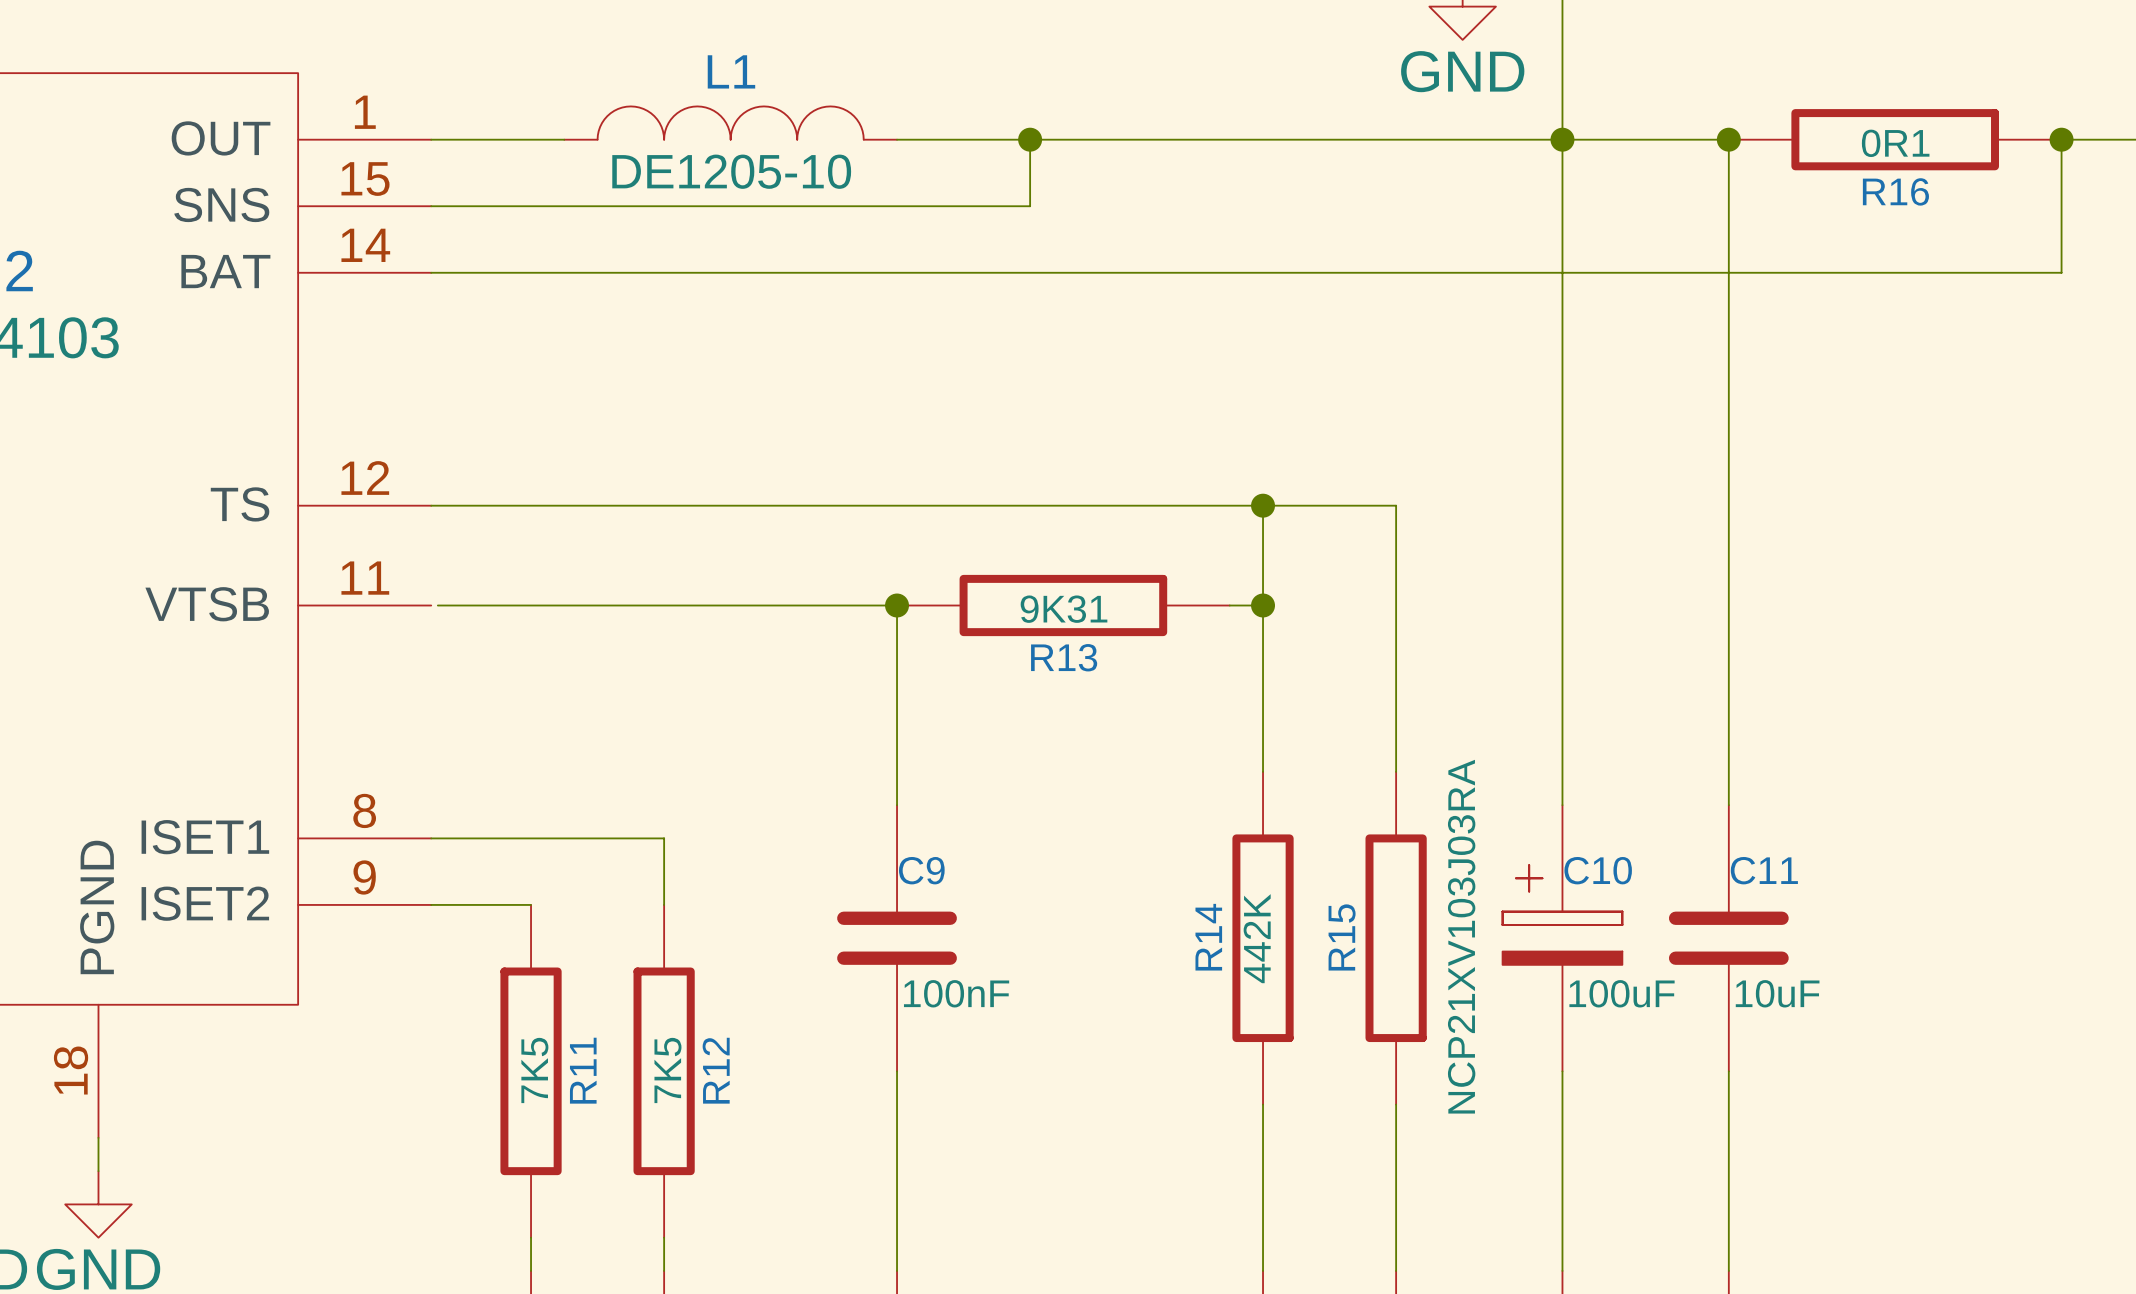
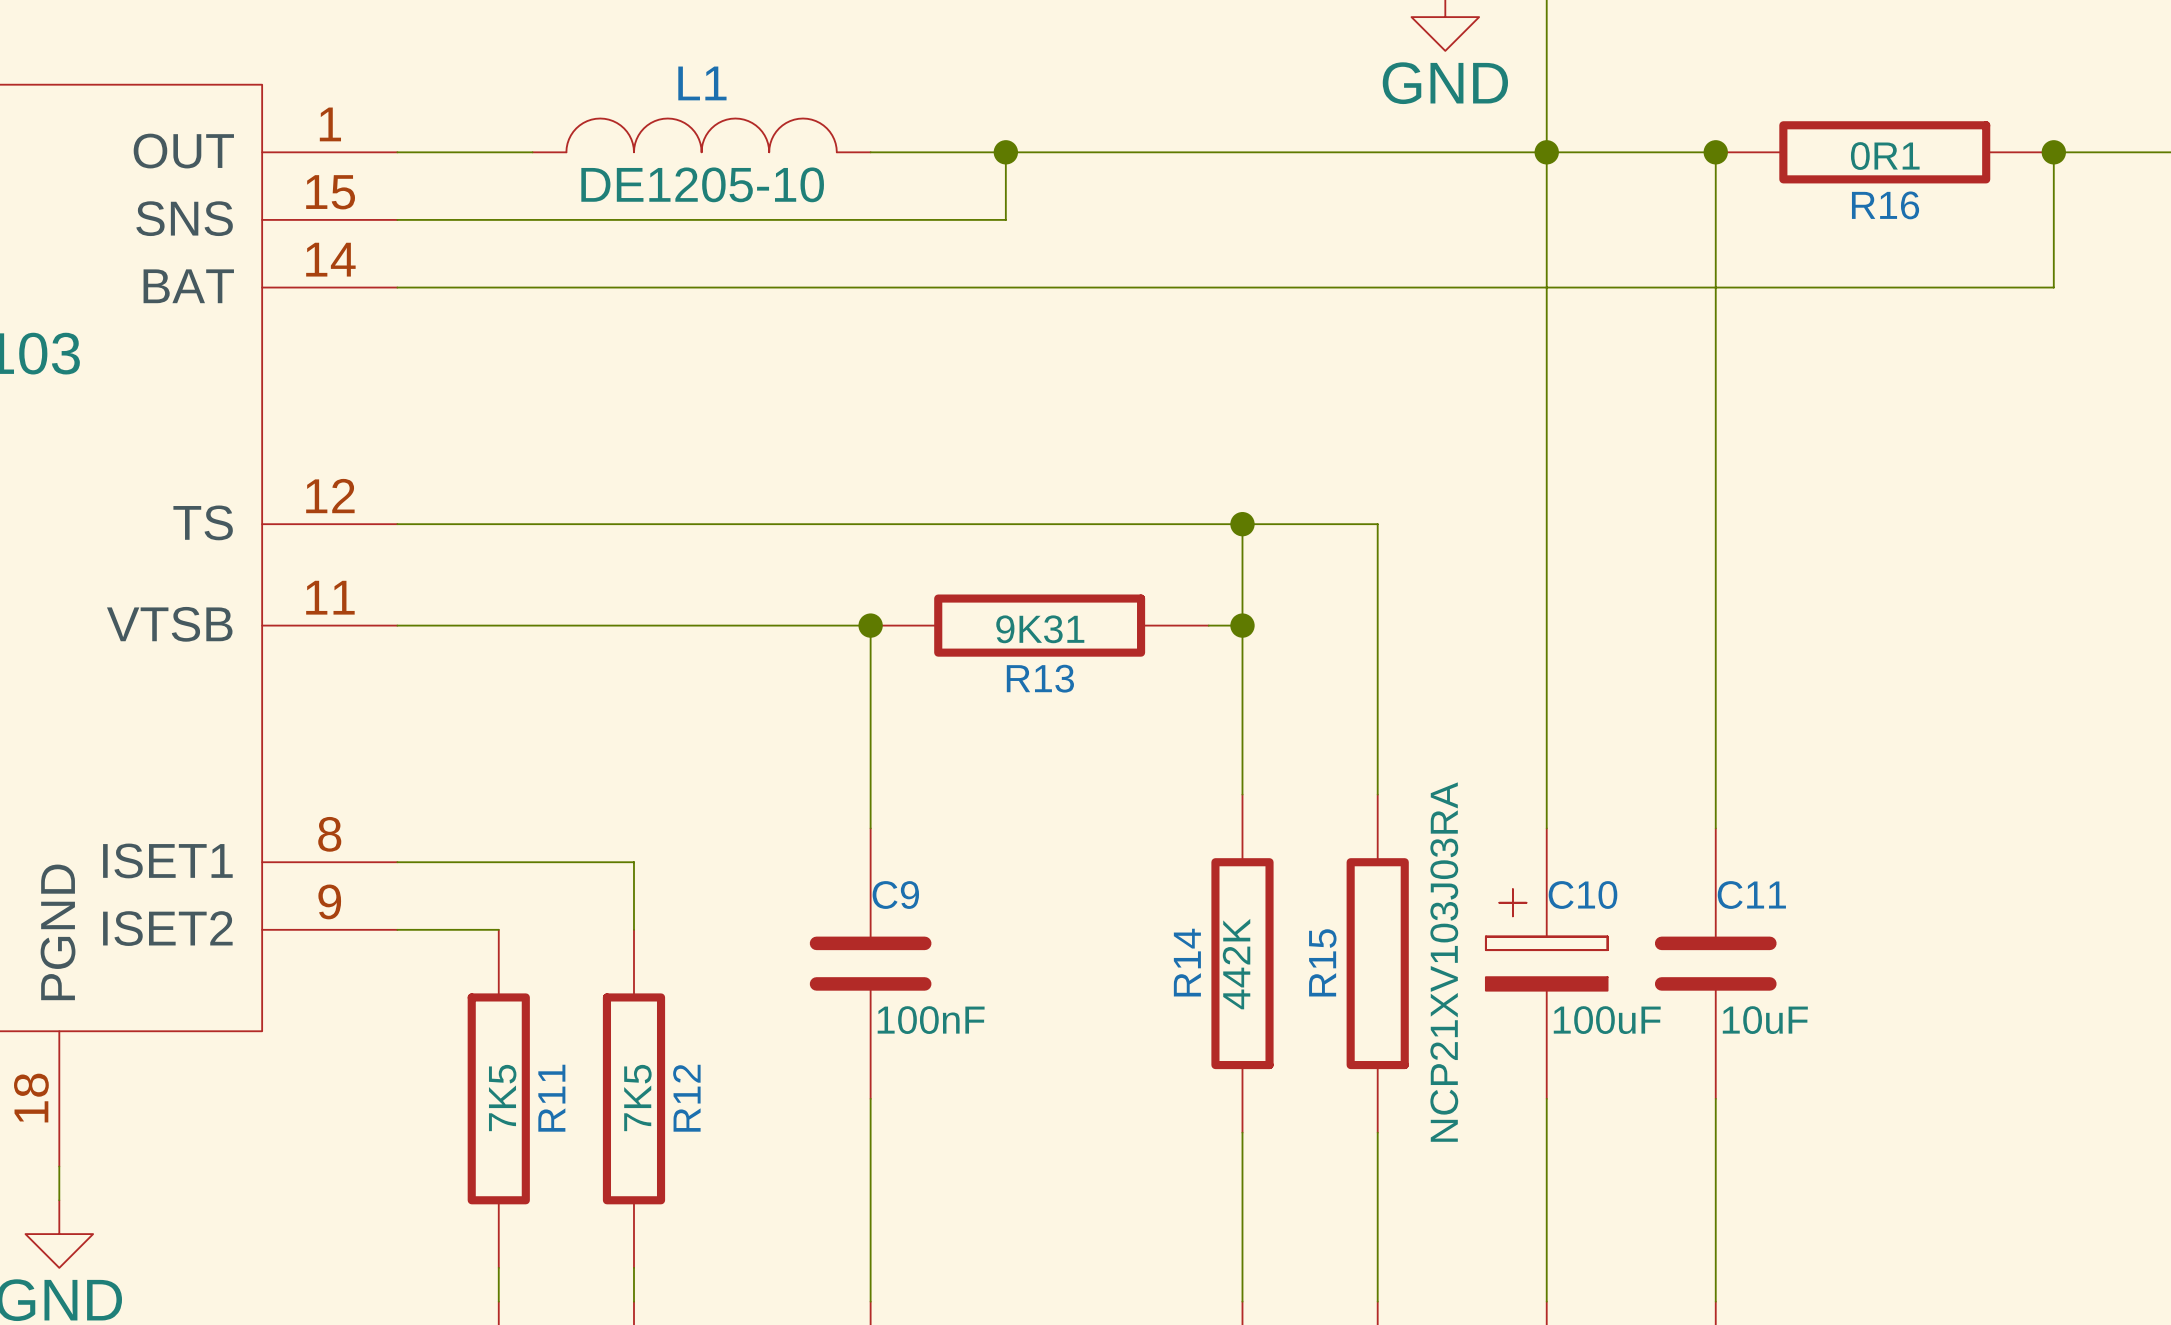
wire: none -> (397, 625) (404, 625)

